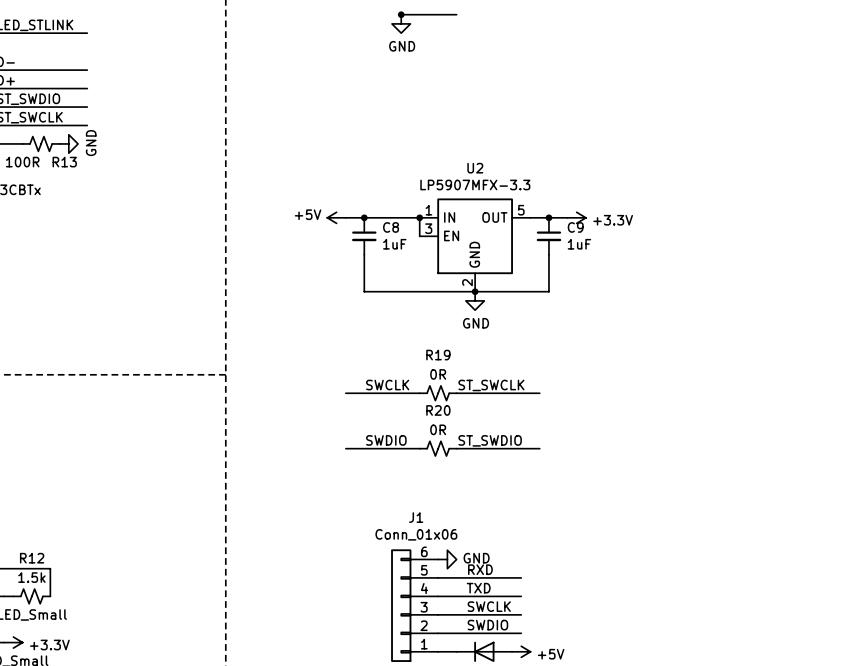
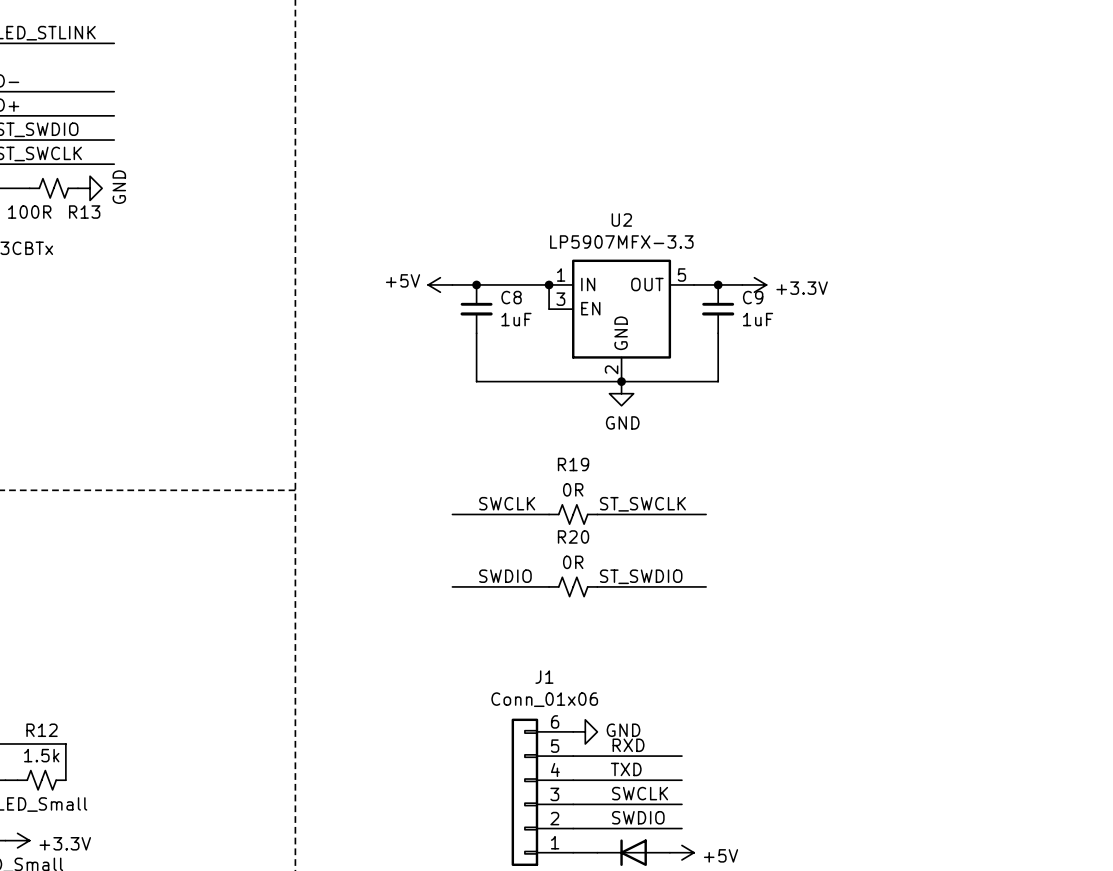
wire: (401, 14) (456, 14) -> none
junction: (401, 14) -> none
power symbol: GND (401, 23) -> none

